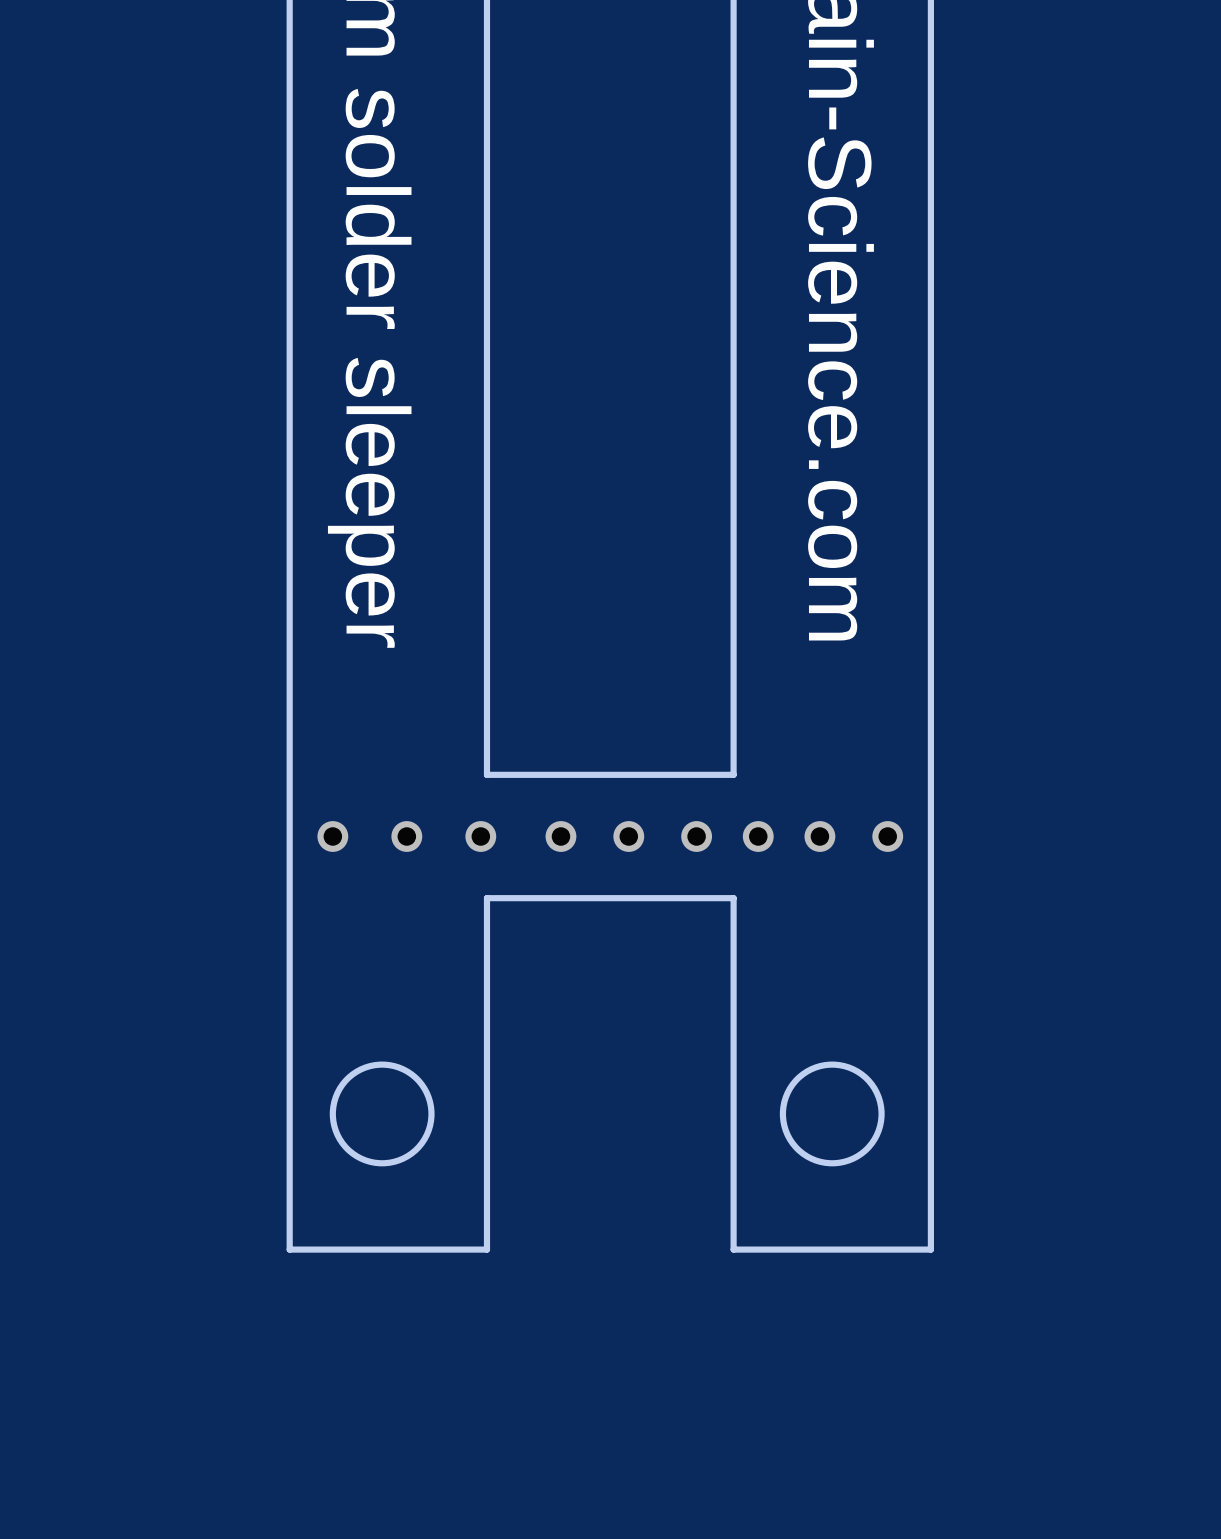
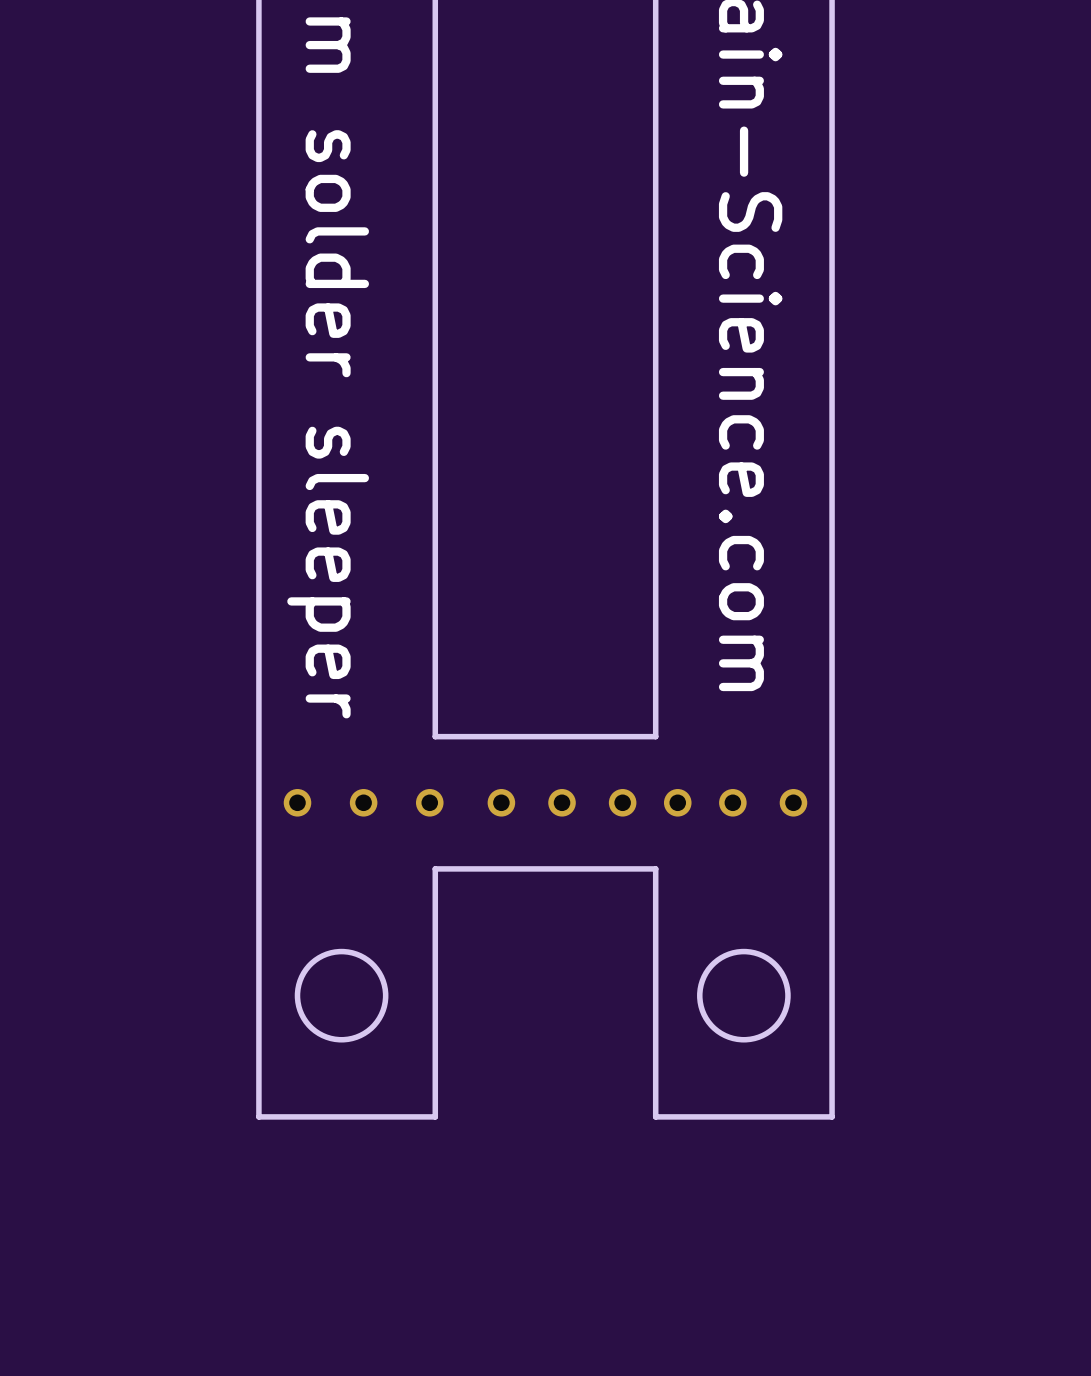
board edge: (733, 774) (486, 774) -> (655, 692) (655, 736) (435, 736) (435, 692)
via: (332, 836) -> none
via: (406, 836) -> none
via: (480, 836) -> none
via: (560, 836) -> none
via: (628, 836) -> none
via: (696, 836) -> none
via: (758, 836) -> none
via: (819, 836) -> none
via: (887, 836) -> none
via: none -> (297, 802)
via: none -> (363, 802)
via: none -> (429, 802)
via: none -> (501, 802)
via: none -> (562, 802)
via: none -> (622, 802)
via: none -> (677, 802)
via: none -> (732, 802)
via: none -> (793, 802)
board edge: (733, 972) (733, 898) (486, 898) (486, 972) -> (655, 868) (435, 868)

